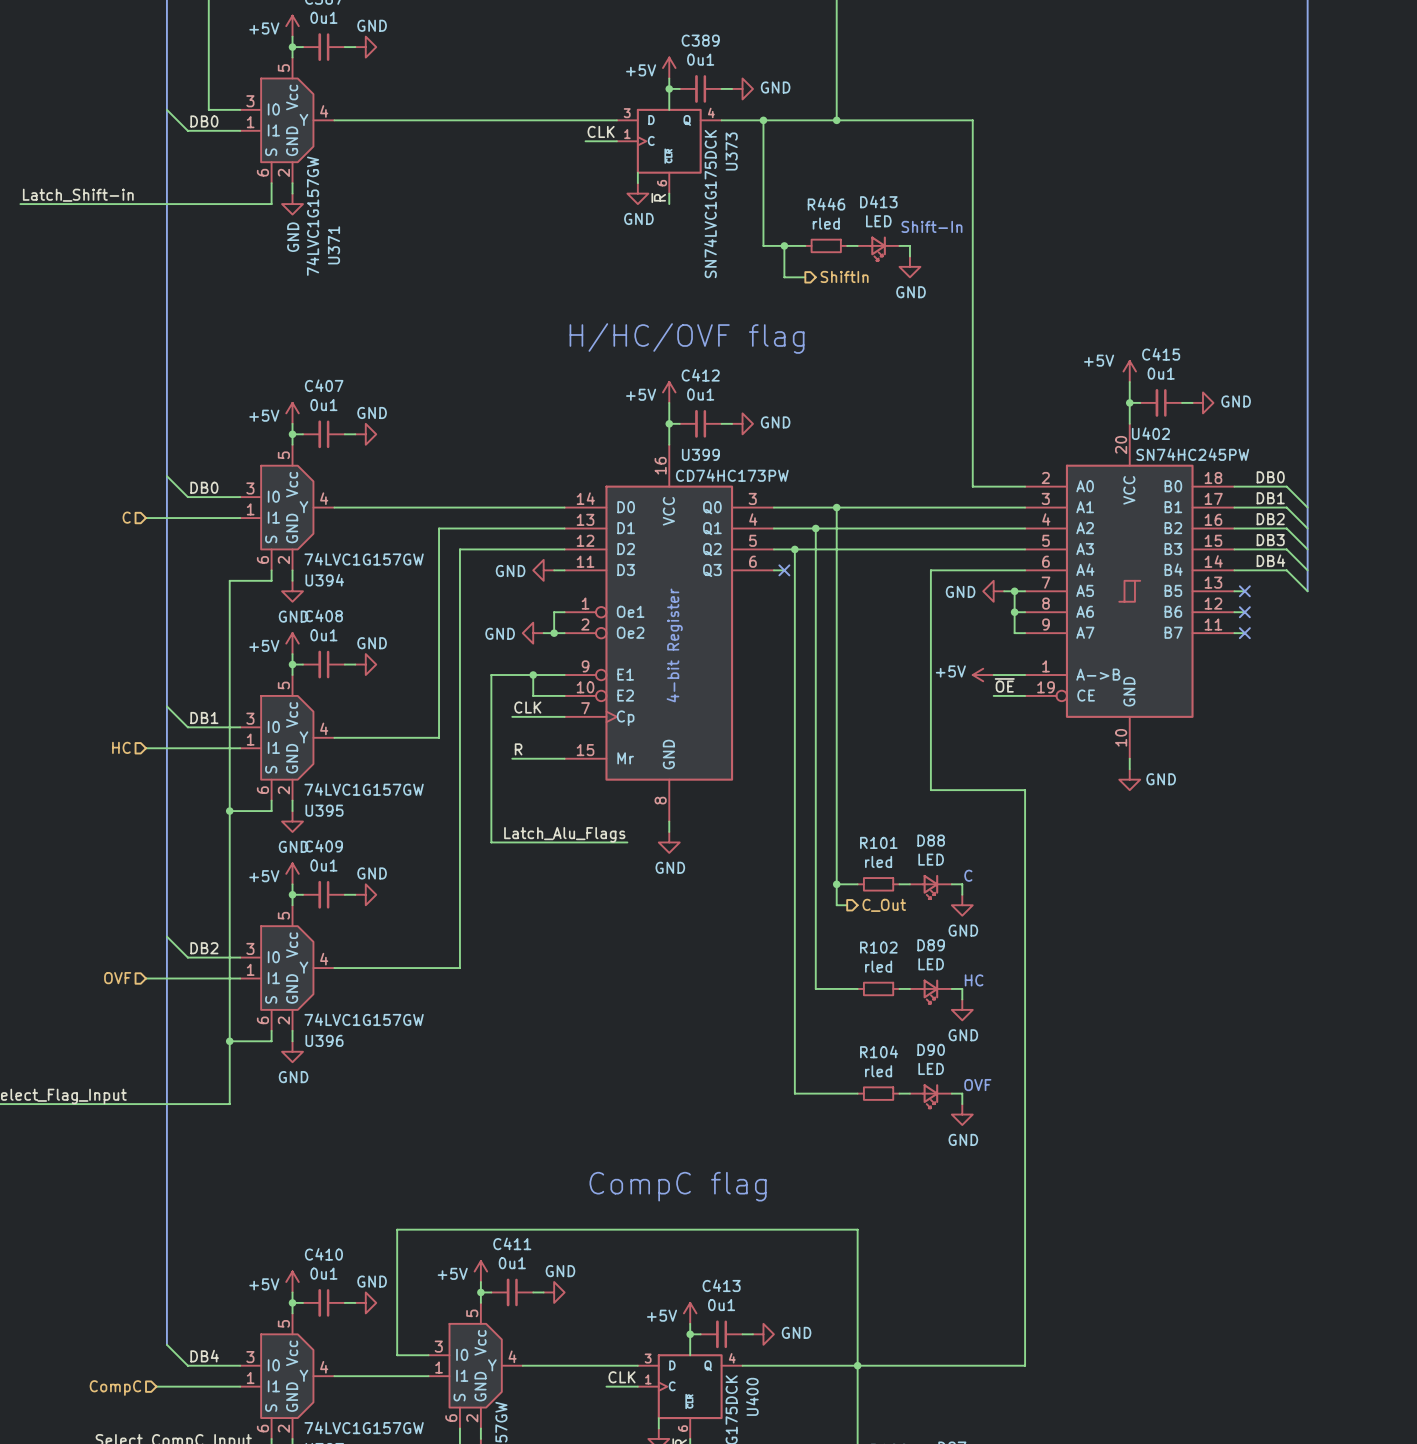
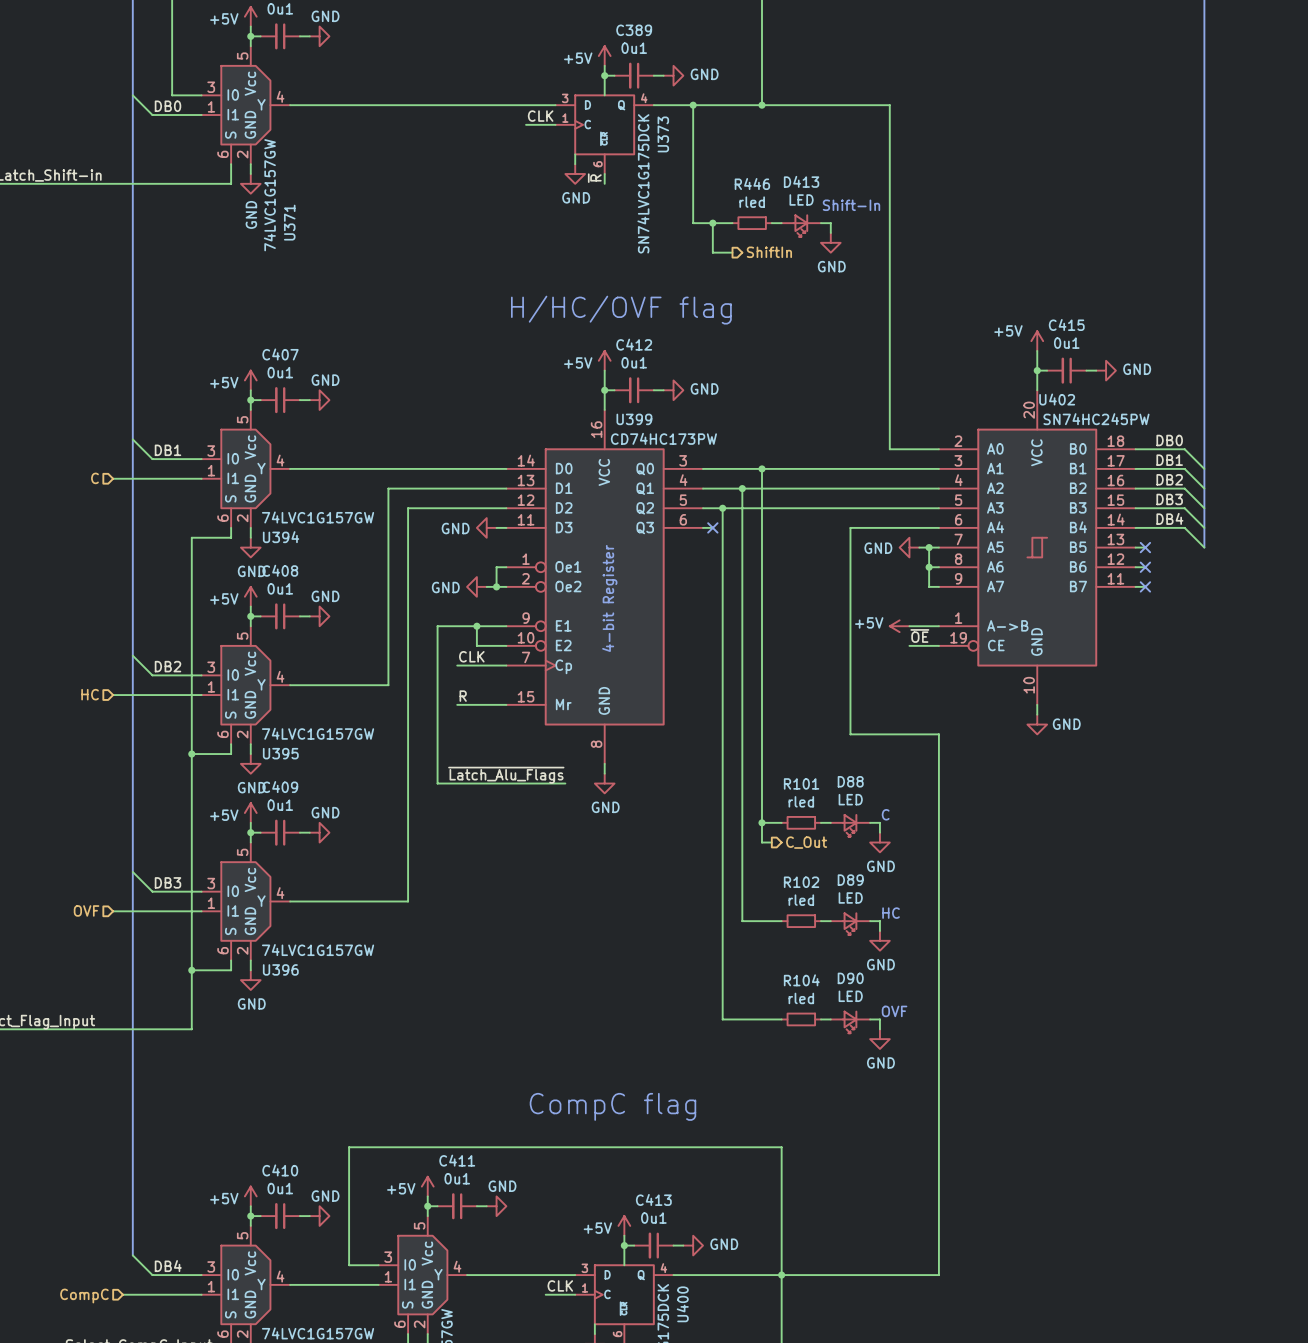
label: DB0 (204, 487) -> DB1 (168, 450)
label: DB1 (204, 718) -> DB2 (168, 666)
label: Latch_Alu_Flags (564, 834) -> ~{Latch_Alu_Flags} (506, 775)
label: DB2 (204, 948) -> DB3 (168, 882)

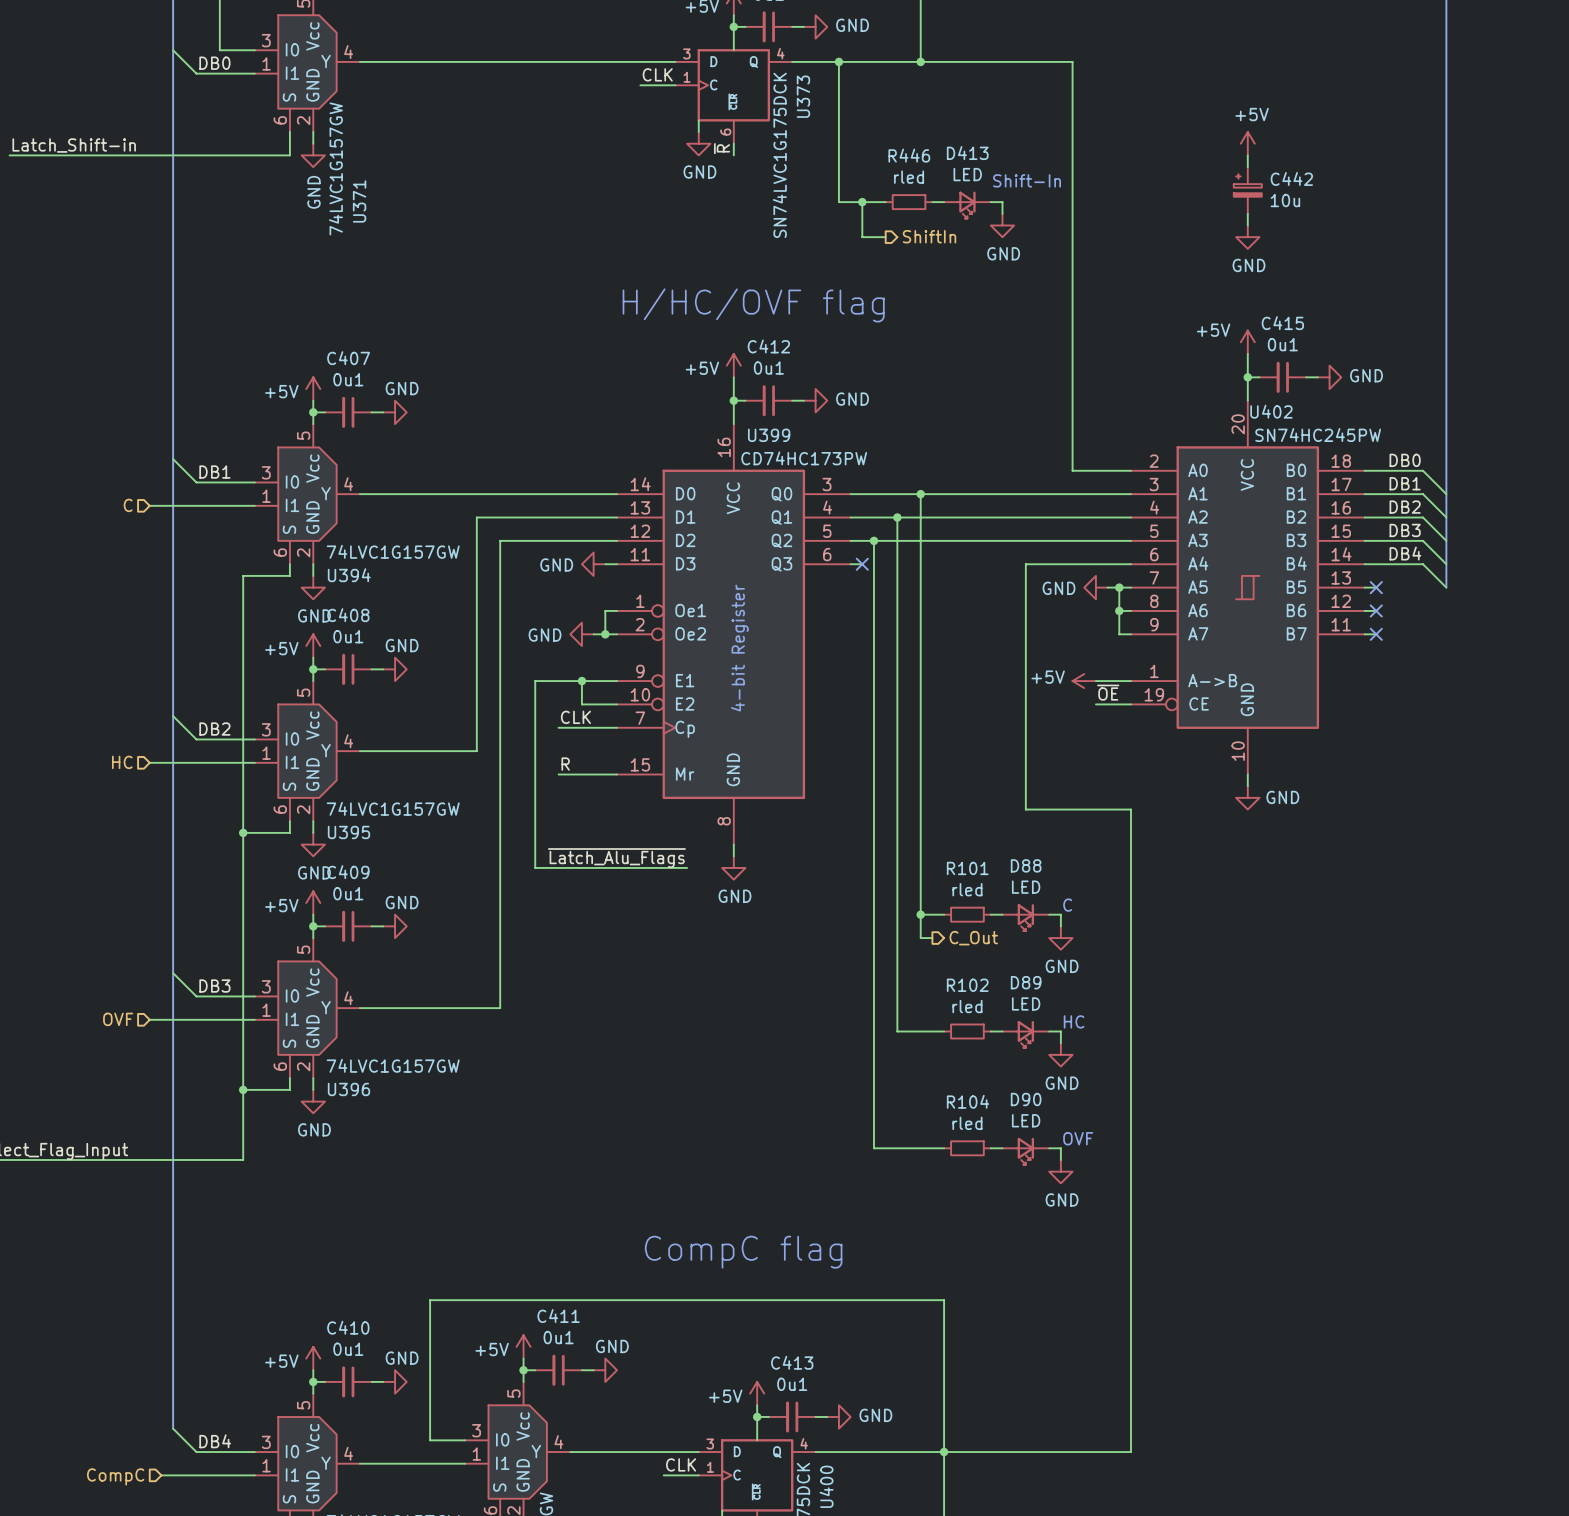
power symbol: none -> +5V (1247, 143)
wire: none -> (1247, 155) (1247, 167)
C442: none -> 10u (1247, 190)
wire: none -> (1247, 213) (1247, 225)
power symbol: none -> GND (1247, 237)

